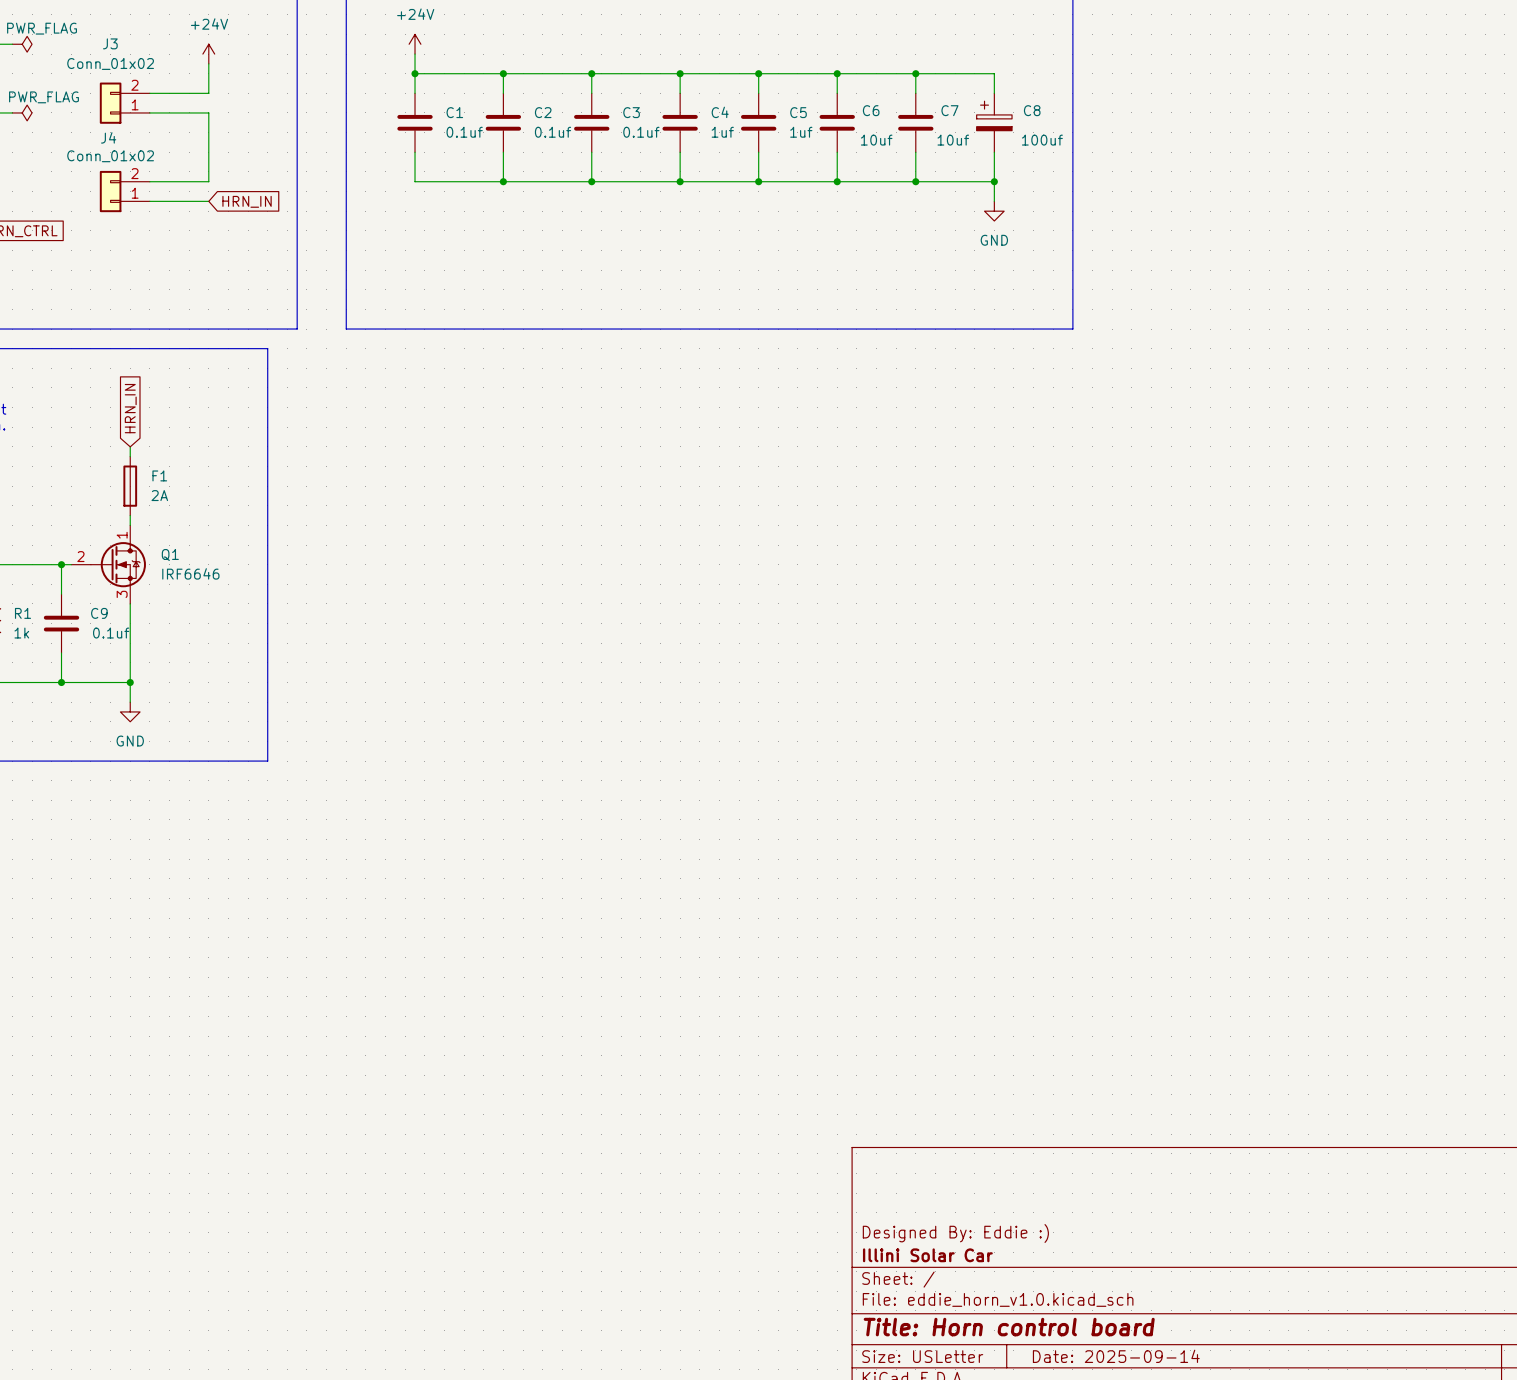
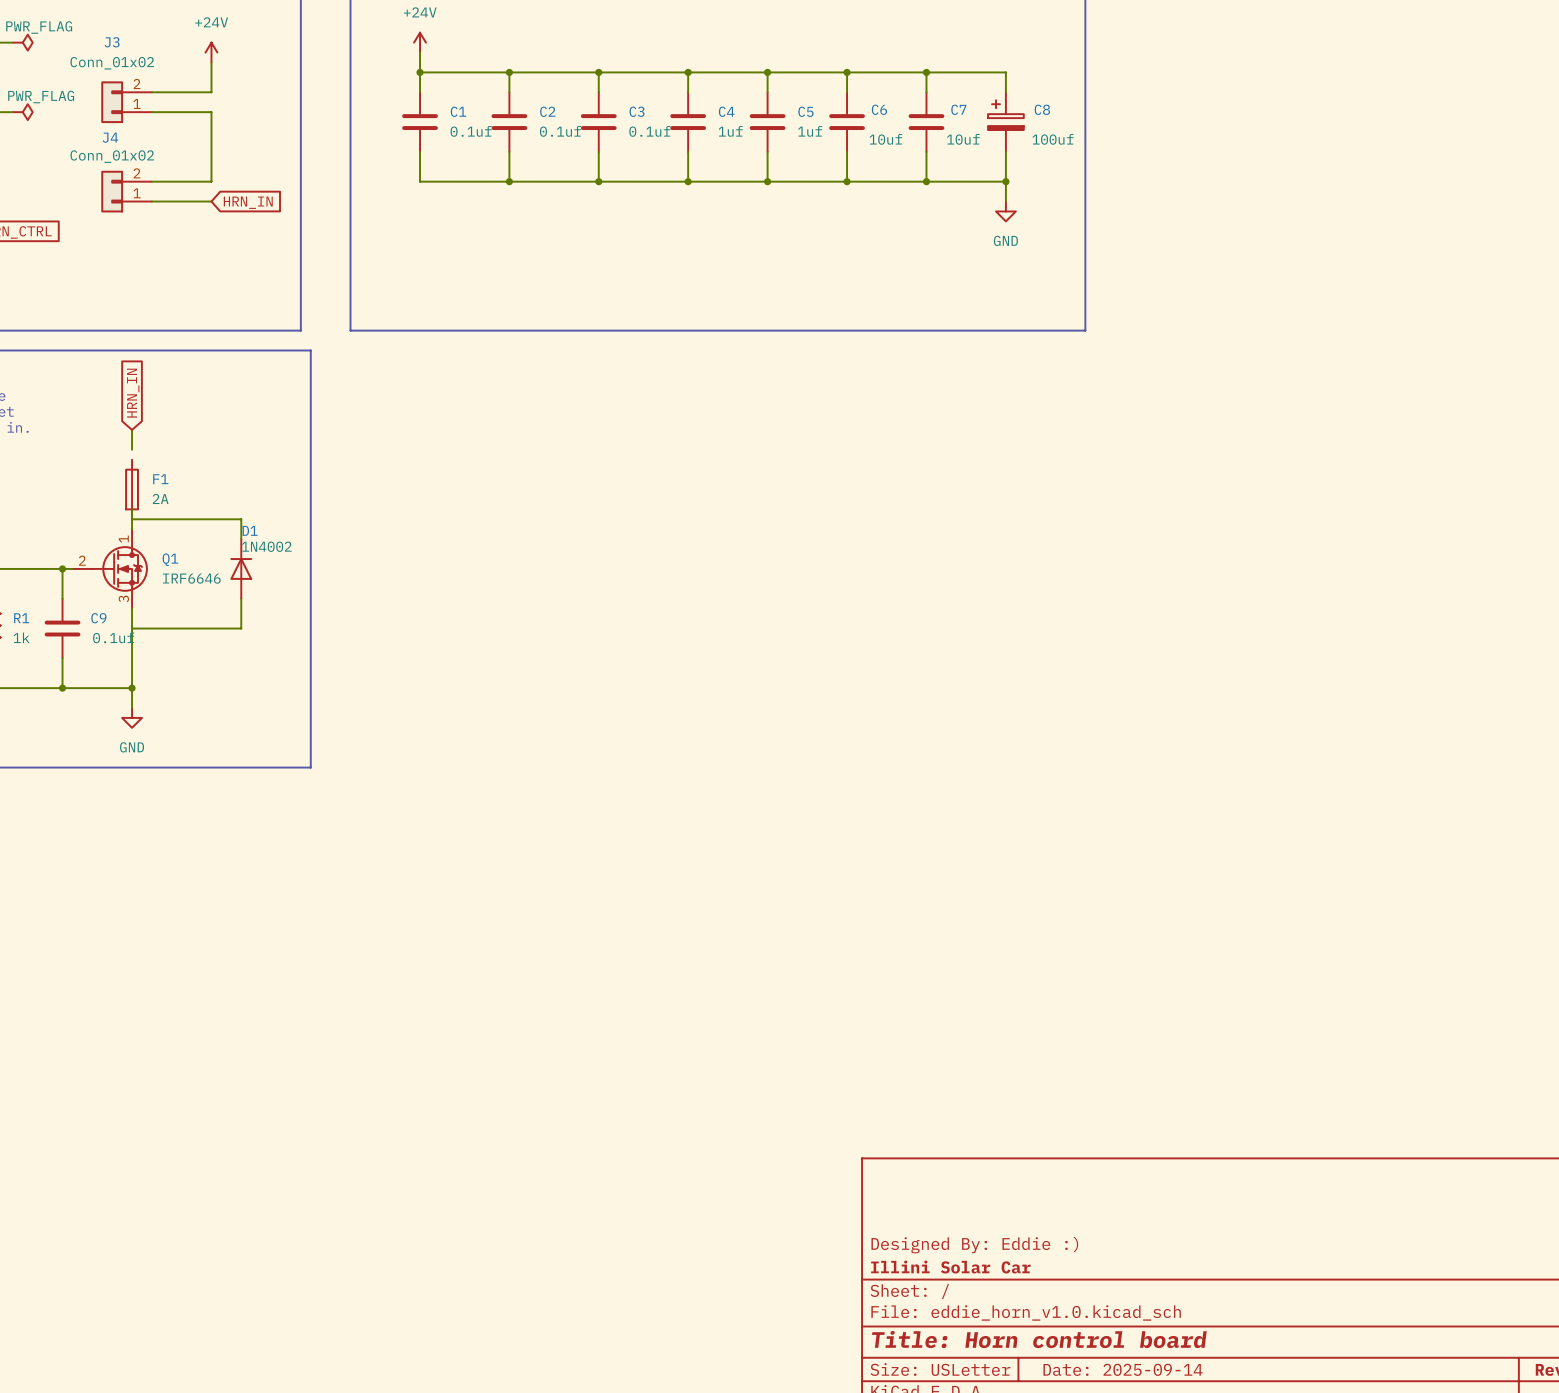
line: (267, 348) (267, 761) -> (271, 350) (310, 350) (310, 767) (271, 767)
global label position: HRN_IN (130, 408) -> HRN_IN (133, 393)
wire: (130, 446) (130, 456) -> (132, 449) (132, 429)
wire: none -> (132, 509) (132, 519) (241, 519) (241, 539)
D1: none -> 1N4002 (241, 568)
wire: none -> (241, 598) (241, 628) (132, 628)

